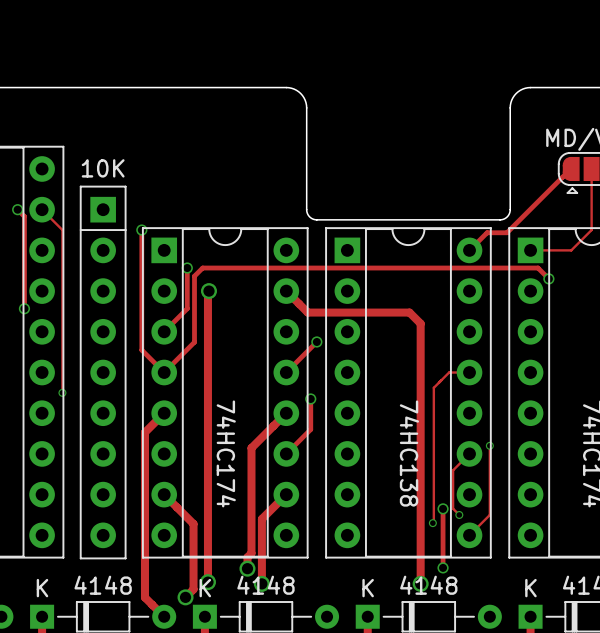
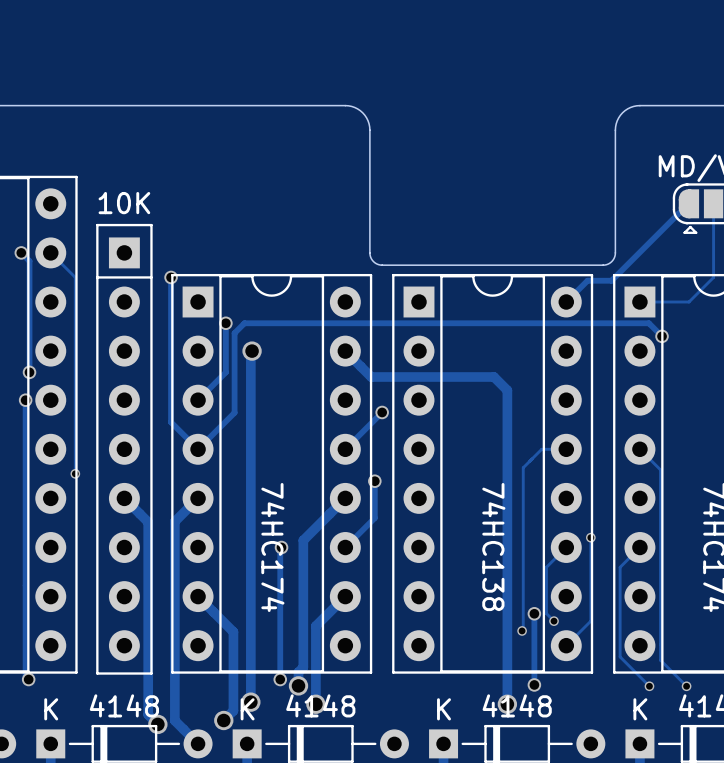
track: none -> (25, 400) (25, 676) (28, 679)
via: none -> (25, 400)
track: none -> (639, 449) (660, 469) (660, 660) (686, 686)
track: none -> (124, 498) (148, 522) (148, 714) (157, 724)
track: none -> (281, 547) (280, 679)
via: none -> (281, 547)
track: none -> (639, 547) (620, 567) (620, 656) (649, 686)
via: none -> (28, 679)
via: none -> (280, 679)
via: none -> (649, 686)
via: none -> (686, 686)
via: none -> (157, 724)

